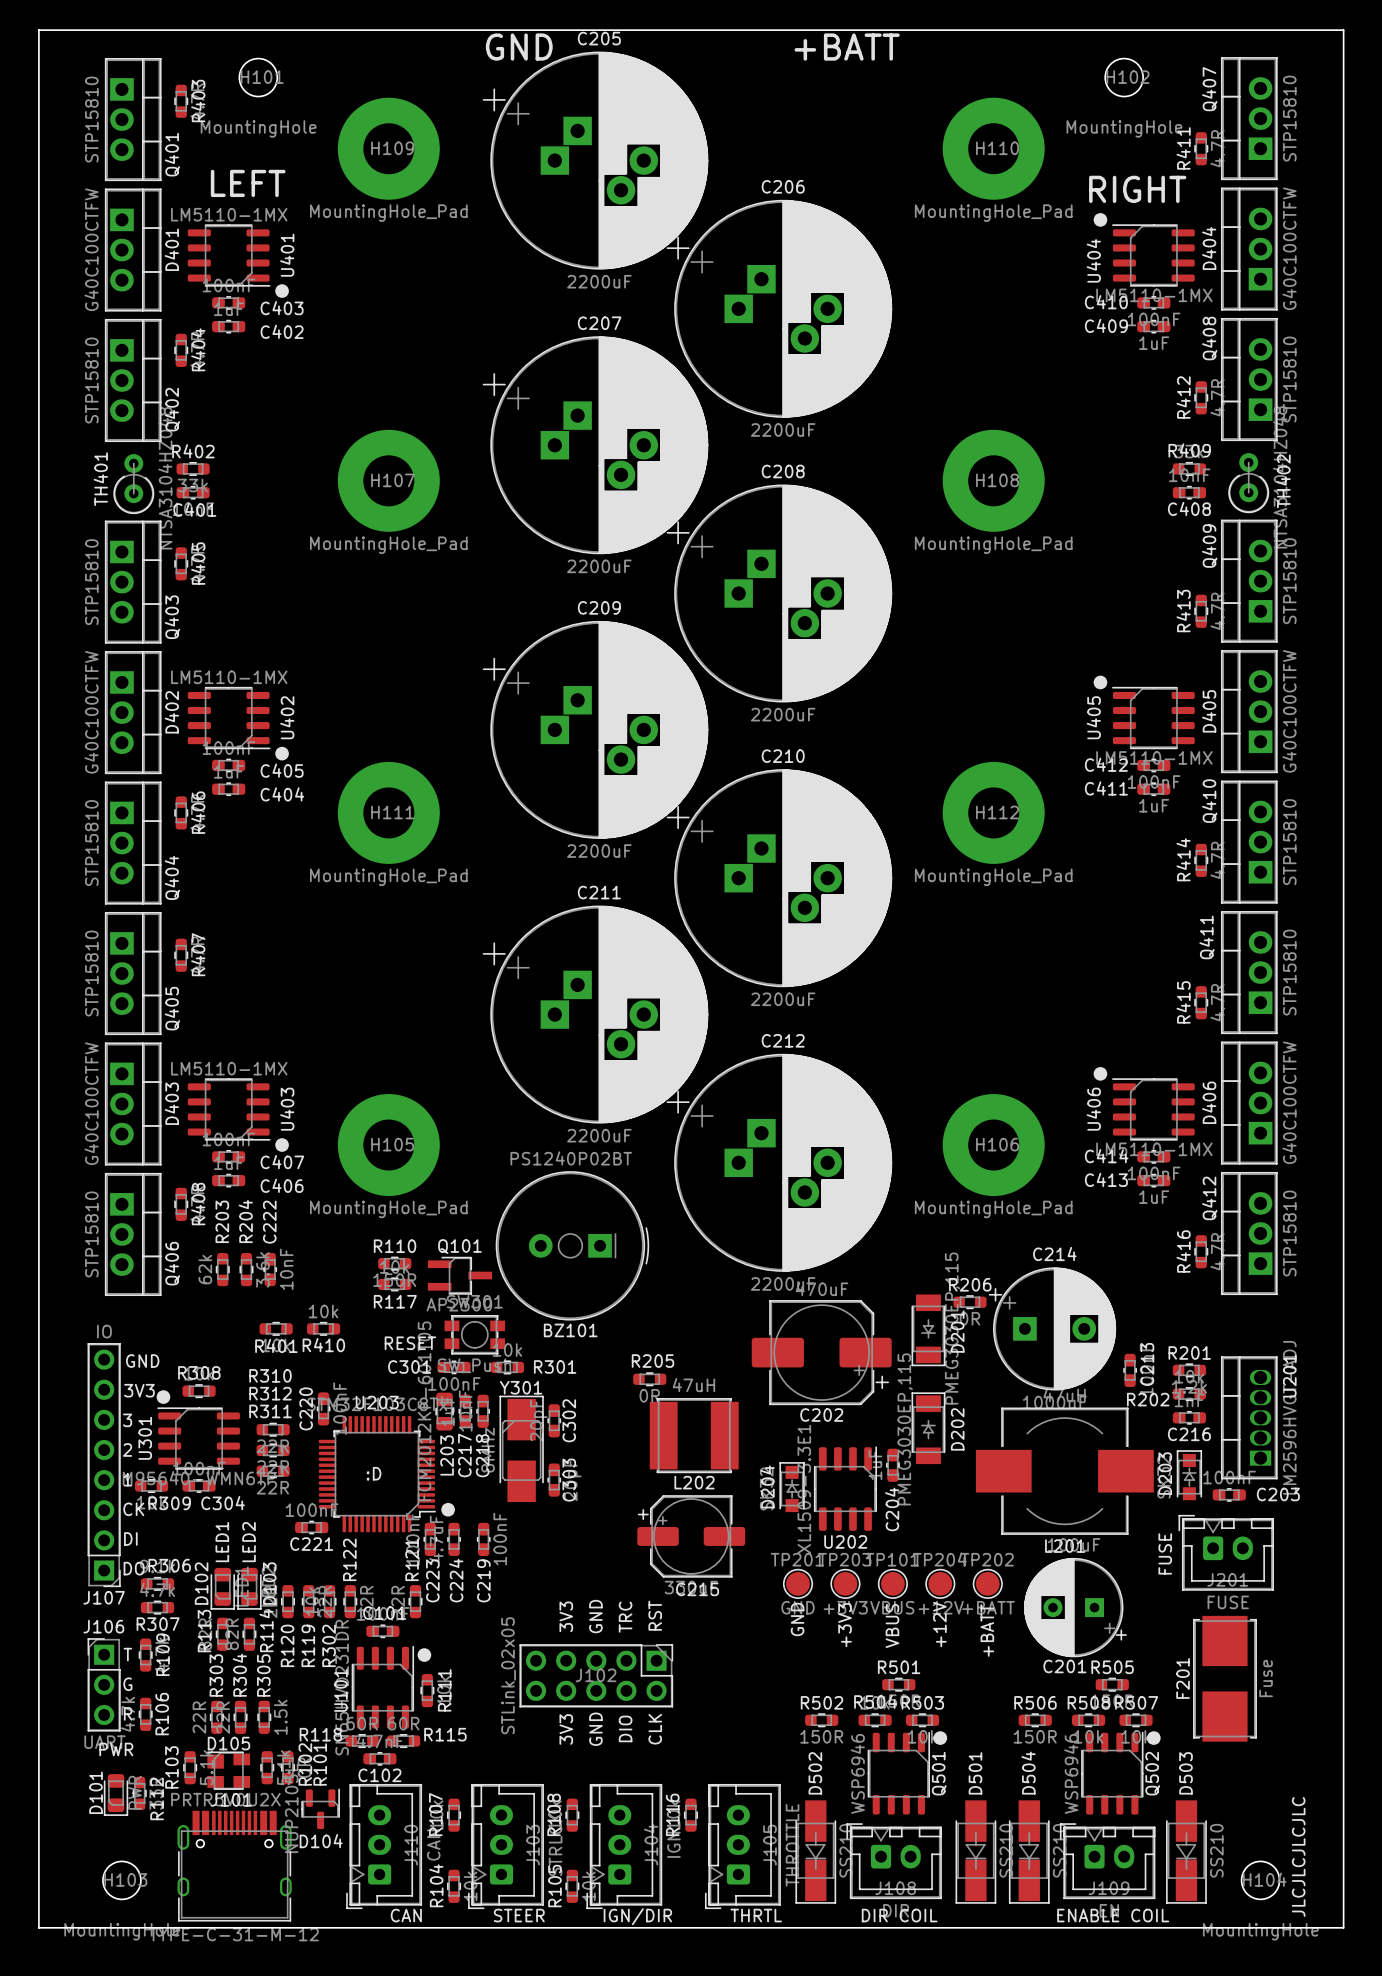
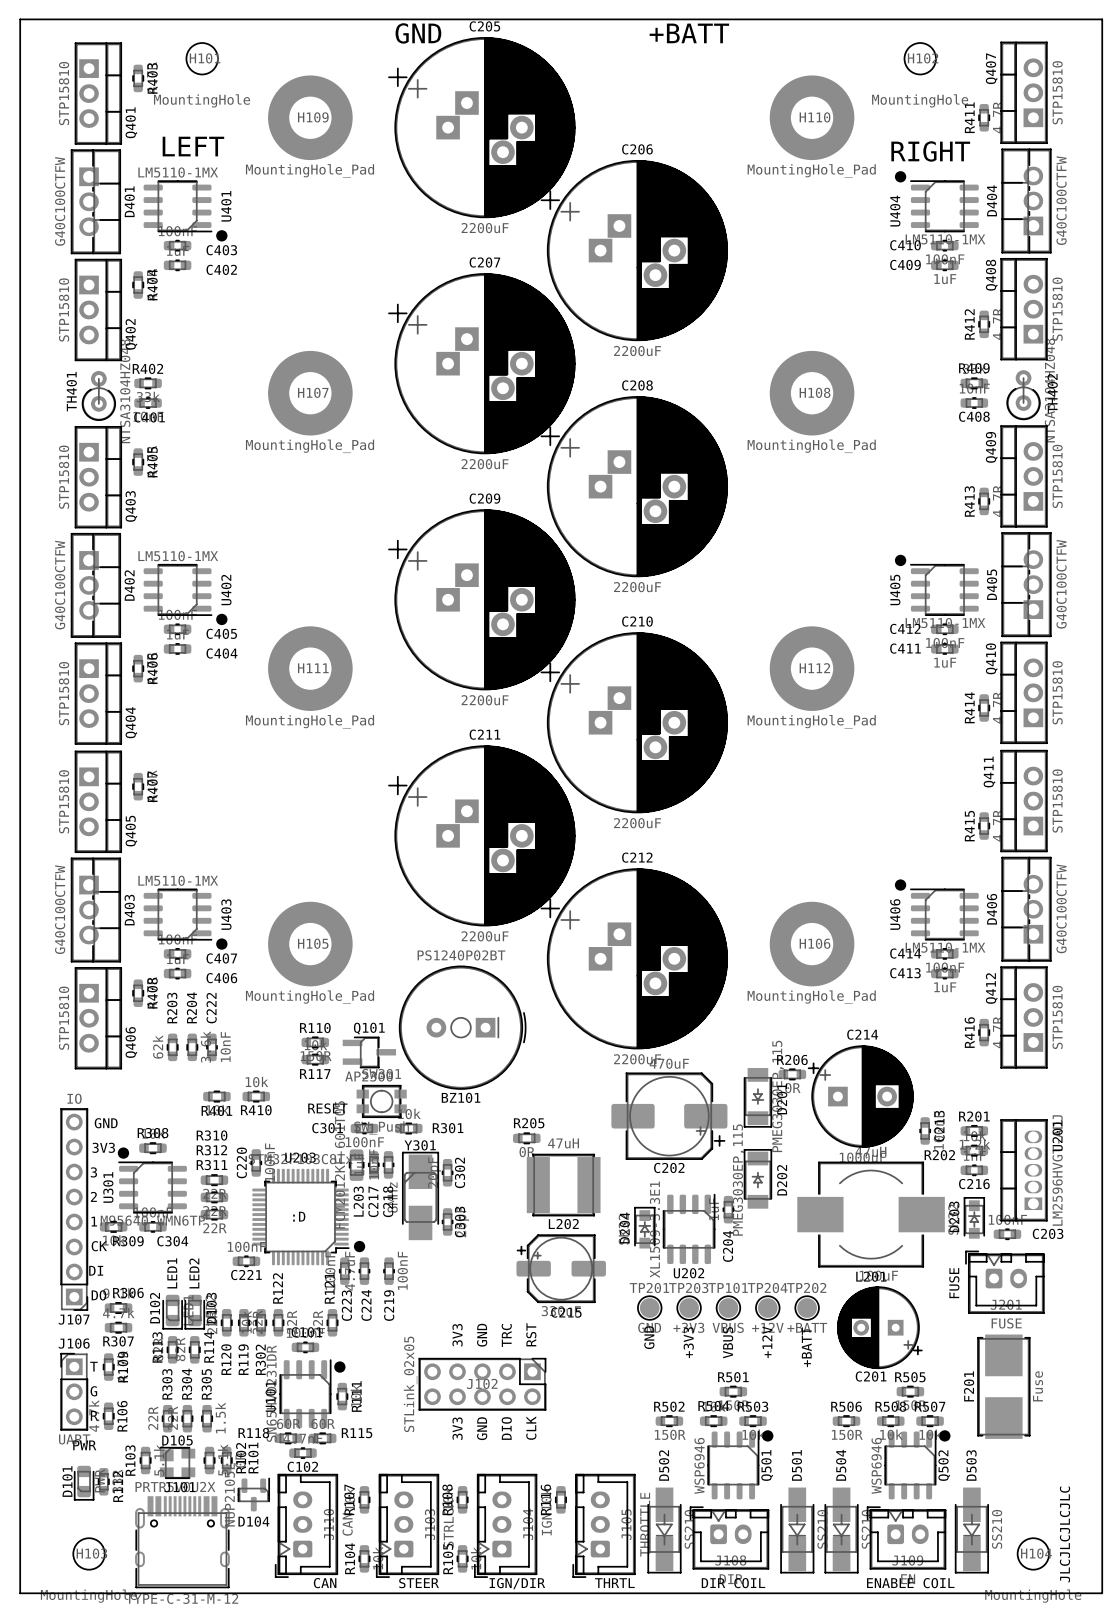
D404 footprint: [1221, 187, 1278, 311] -> [1001, 148, 1052, 254]
D401 footprint: [104, 188, 162, 312] -> [71, 149, 121, 255]
D405 footprint: [1221, 650, 1278, 774] -> [1001, 532, 1052, 637]
D402 footprint: [104, 651, 162, 775] -> [71, 533, 121, 638]
D406 footprint: [1221, 1041, 1278, 1165] -> [1001, 857, 1052, 962]
D403 footprint: [104, 1042, 162, 1166] -> [71, 857, 121, 963]

